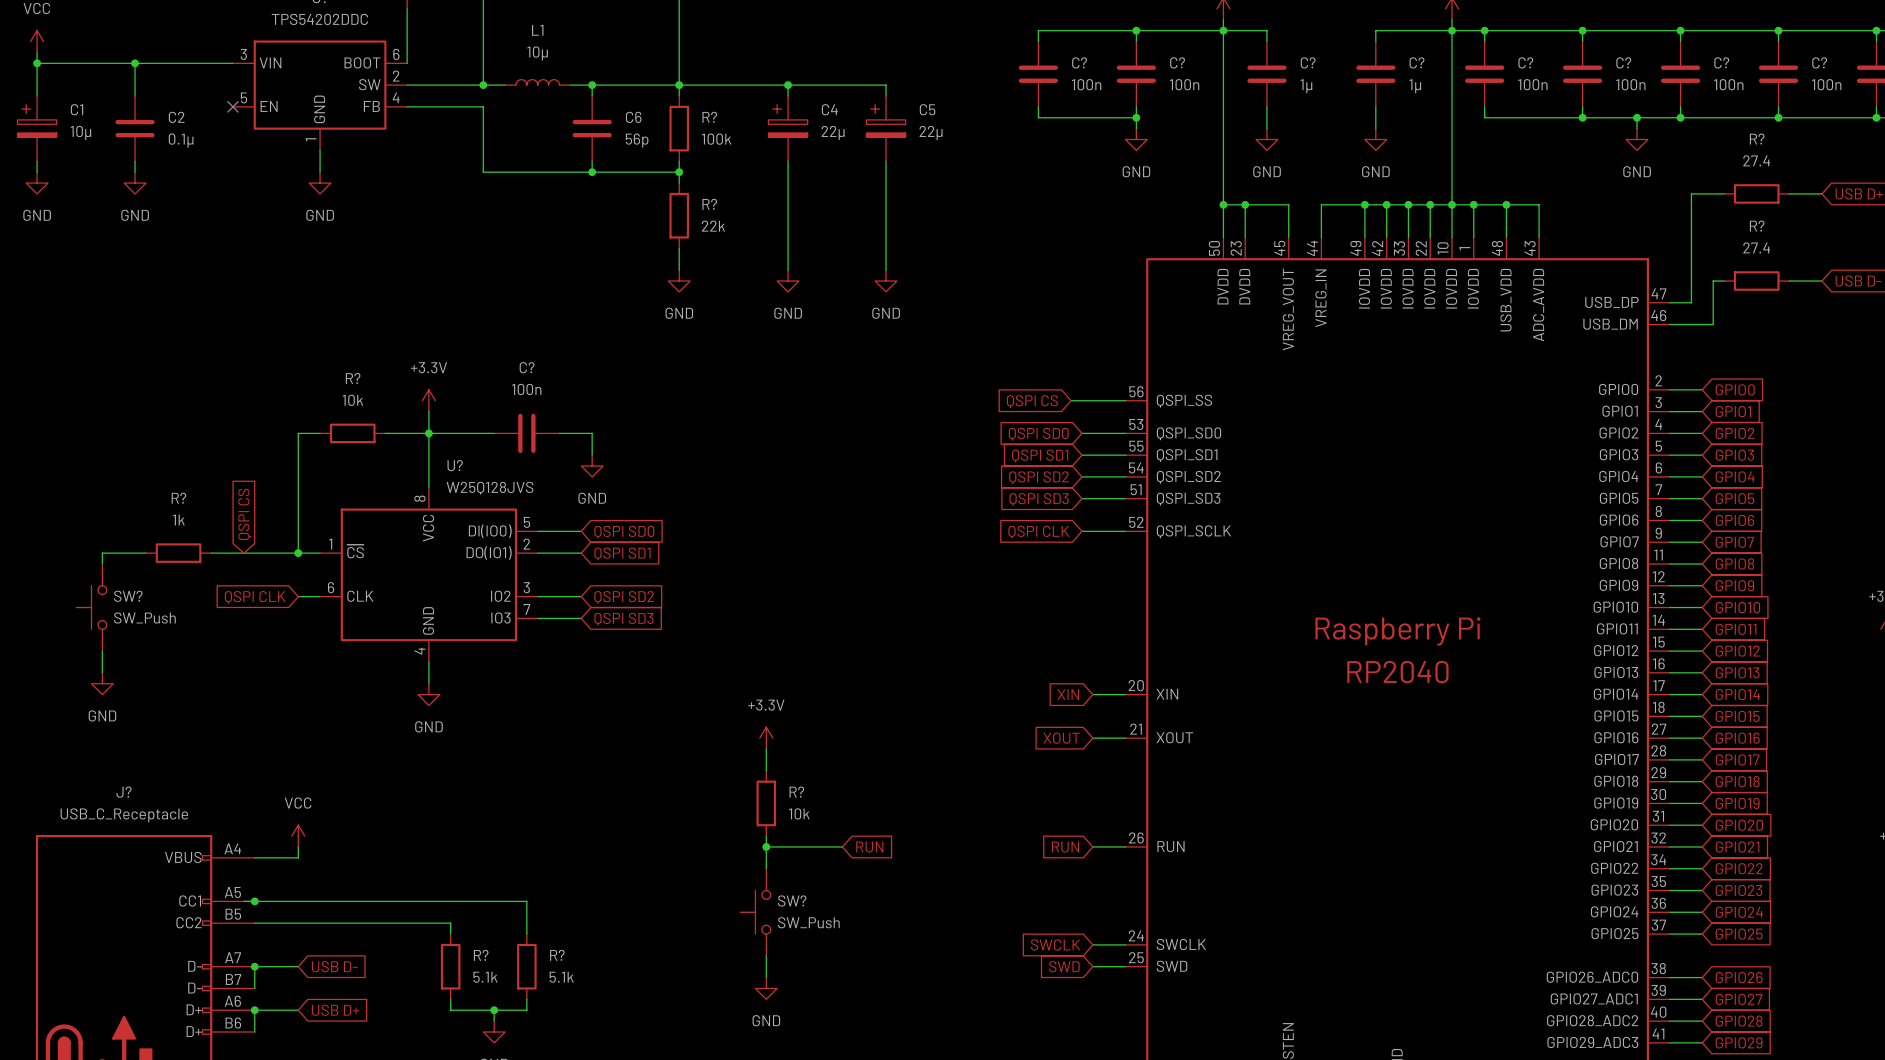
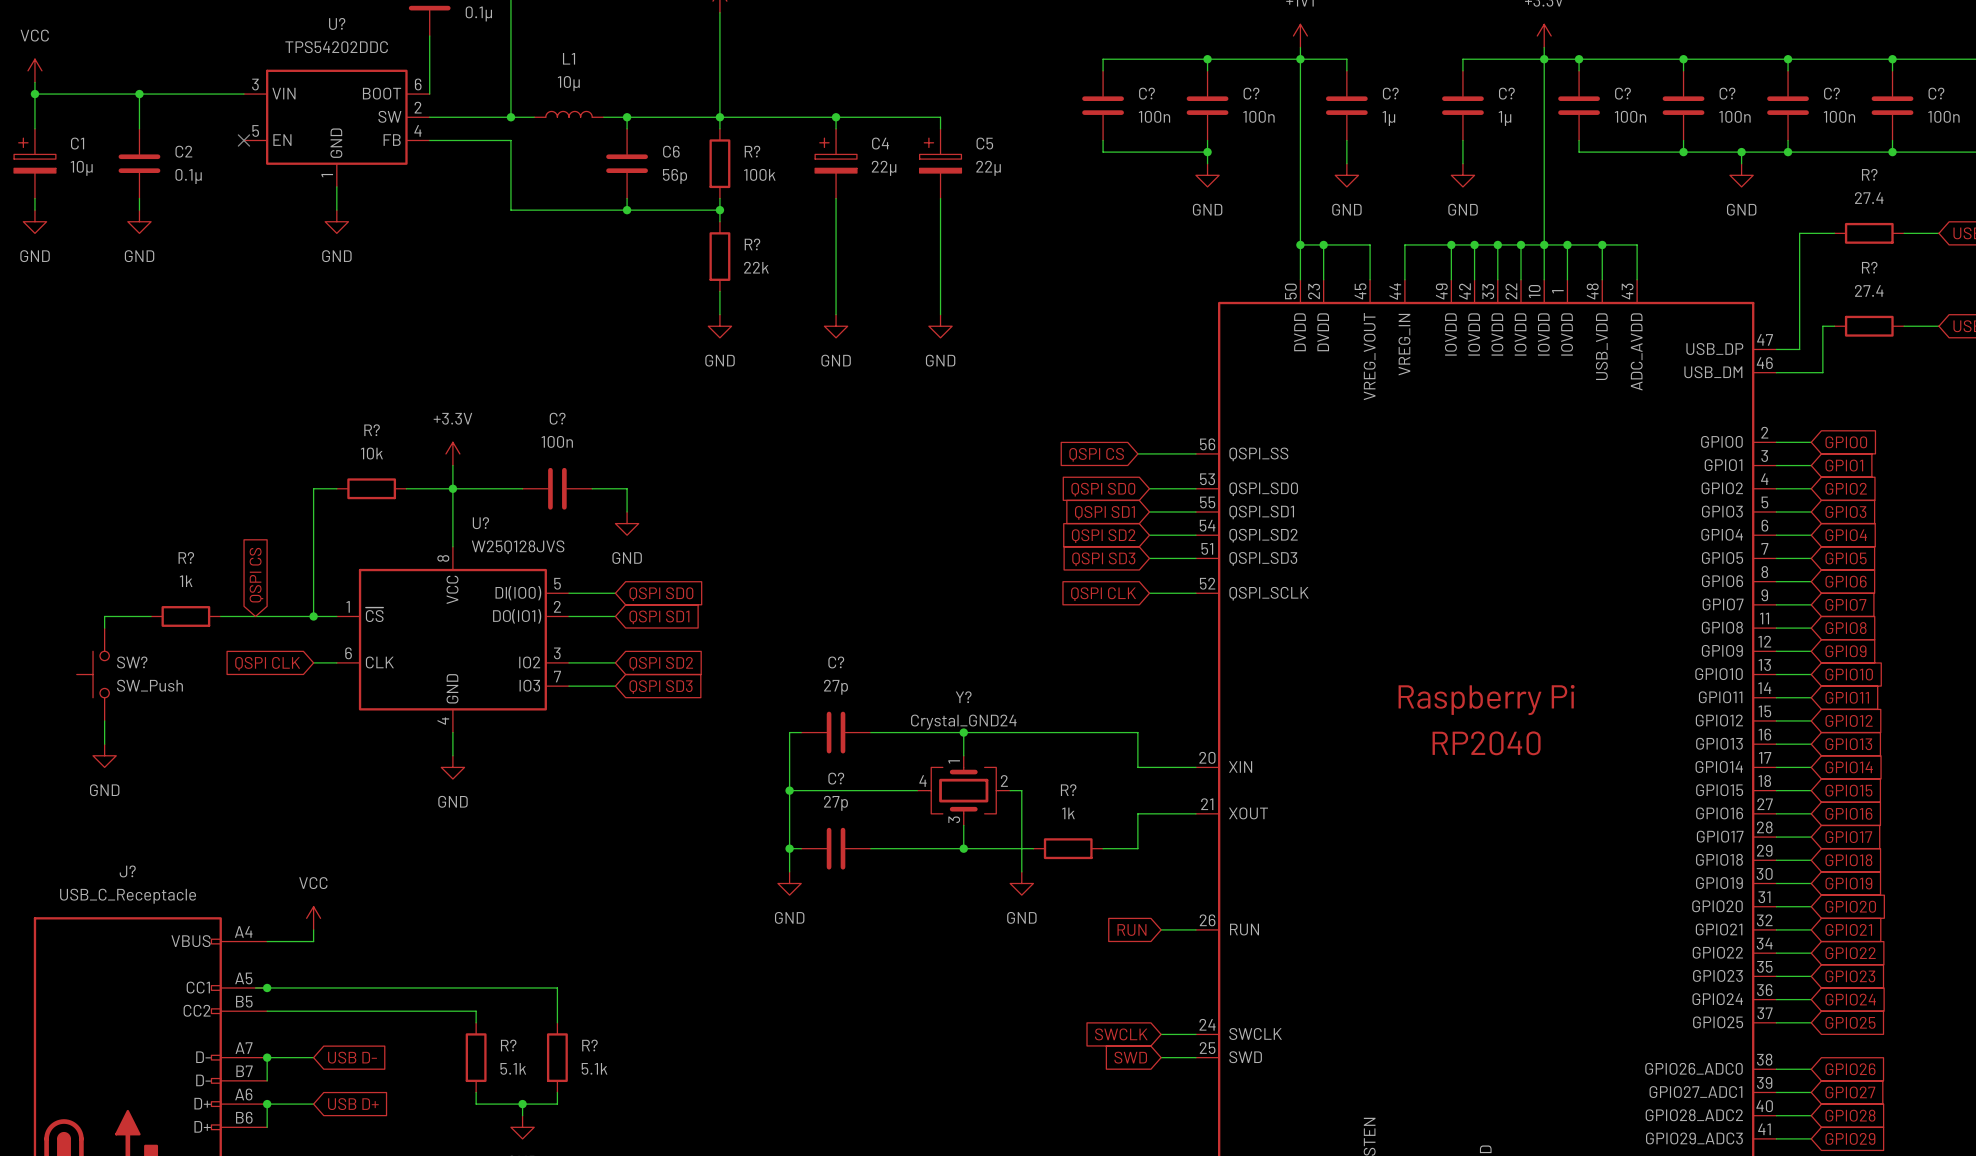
wire: none -> (801, 732) (789, 732) (789, 871)
C?: none -> 27p (836, 732)
wire: none -> (870, 732) (1137, 732) (1137, 767) (1161, 767)
wire: none -> (963, 732) (963, 755)
junction: none -> (963, 732)
global label: XIN (1068, 694) -> none
wire: none -> (789, 790) (917, 790)
junction: none -> (789, 790)
Y?: none -> Crystal_GND24 (963, 790)
wire: none -> (1010, 790) (1021, 790) (1021, 871)
power symbol: +3.3V (766, 738) -> none
global label: XOUT (1061, 738) -> none
wire: none -> (1161, 813) (1137, 813) (1137, 848) (1103, 848)
wire: (766, 749) (766, 770) -> (963, 825) (963, 848)
wire: none -> (789, 848) (801, 848)
junction: none -> (789, 848)
C?: none -> 27p (836, 848)
wire: none -> (870, 848) (1033, 848)
junction: none -> (963, 848)
R?: none -> 1k (1068, 848)
power symbol: none -> GND (789, 883)
R?: 10k (766, 803) -> none
power symbol: none -> GND (1021, 883)
wire: (766, 836) (766, 868) -> none
wire: (766, 846) (842, 846) -> none
junction: (766, 846) -> none
global label: RUN (869, 847) -> none
SW?: SW_Push (755, 912) -> none
wire: (766, 955) (766, 977) -> none
power symbol: GND (766, 988) -> none

